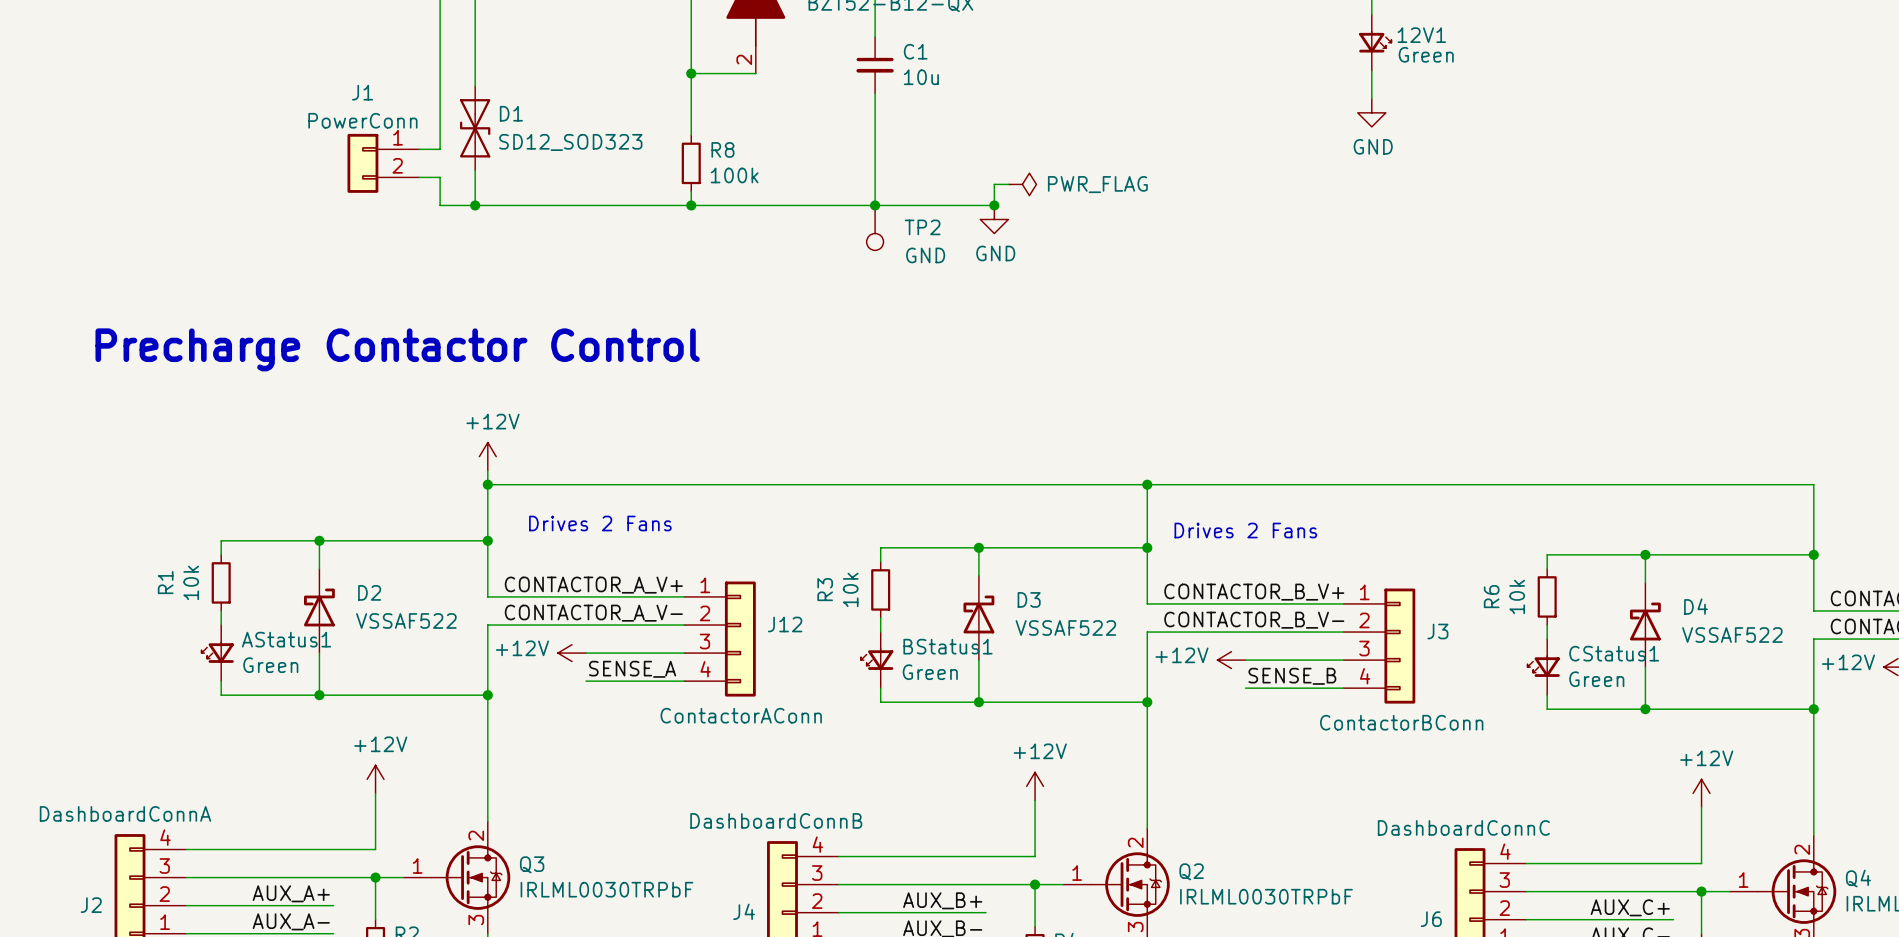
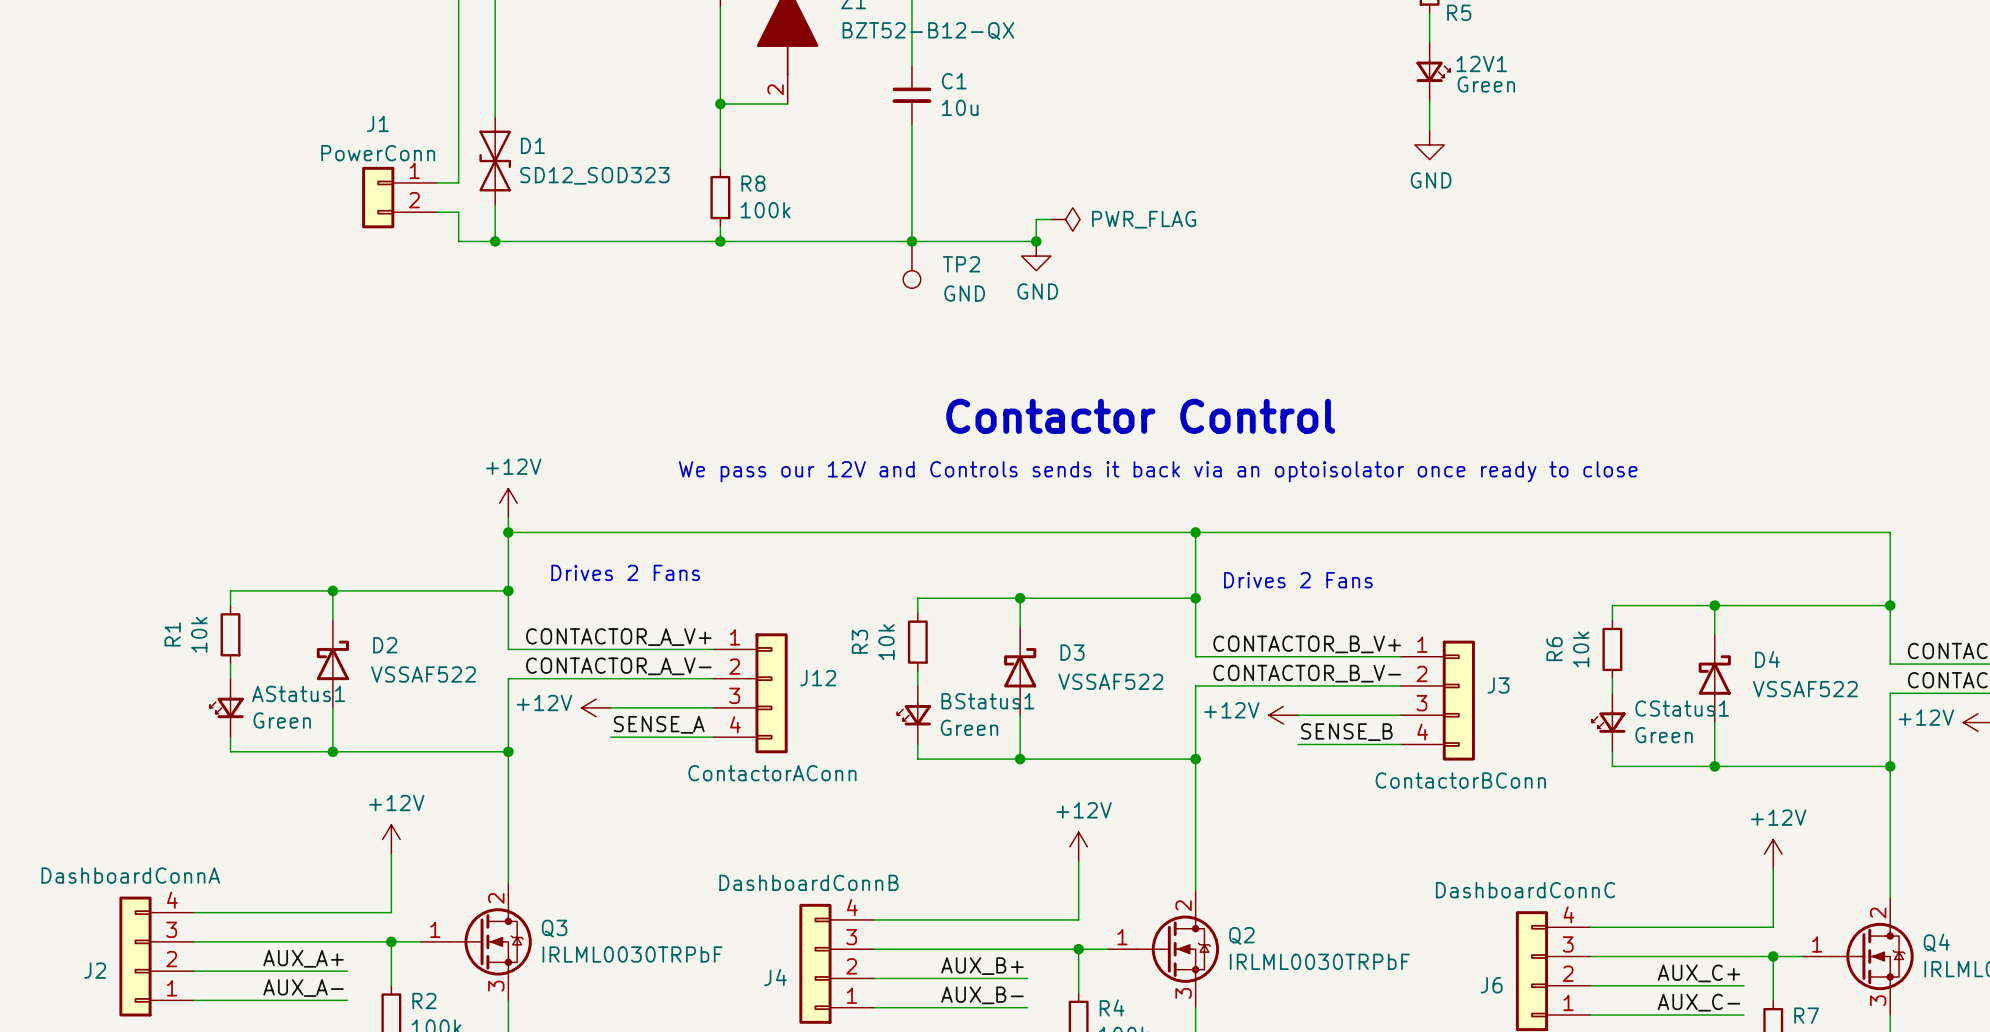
text: Precharge Contactor Control (397, 349) -> none
text: none -> Contactor Control (1140, 416)
text: none -> We pass our 12V and Controls sends it back via an optoisolator once ready to close (1158, 471)

